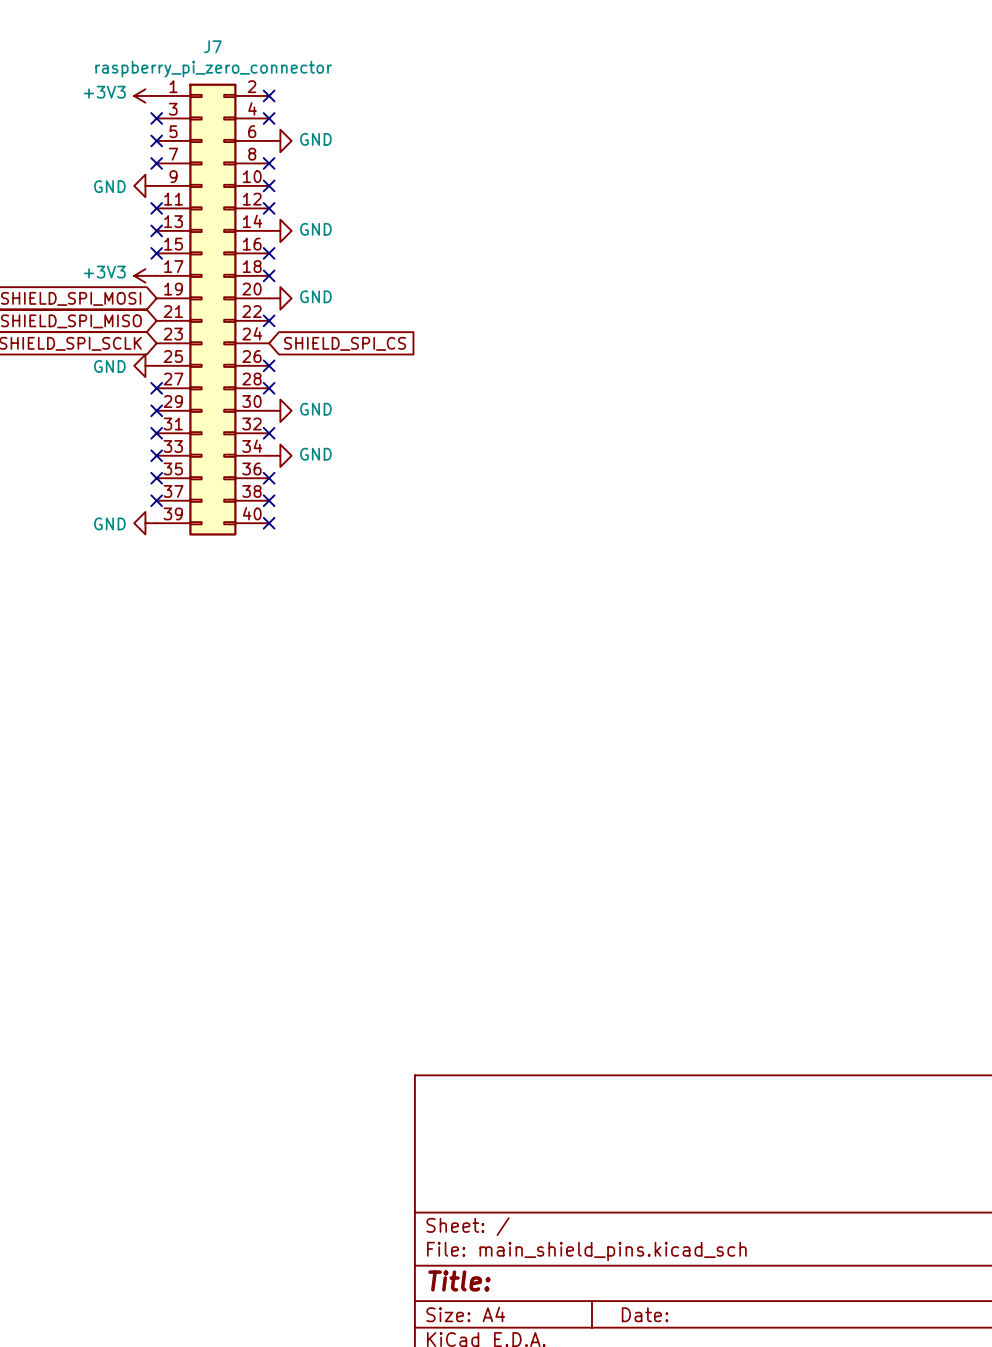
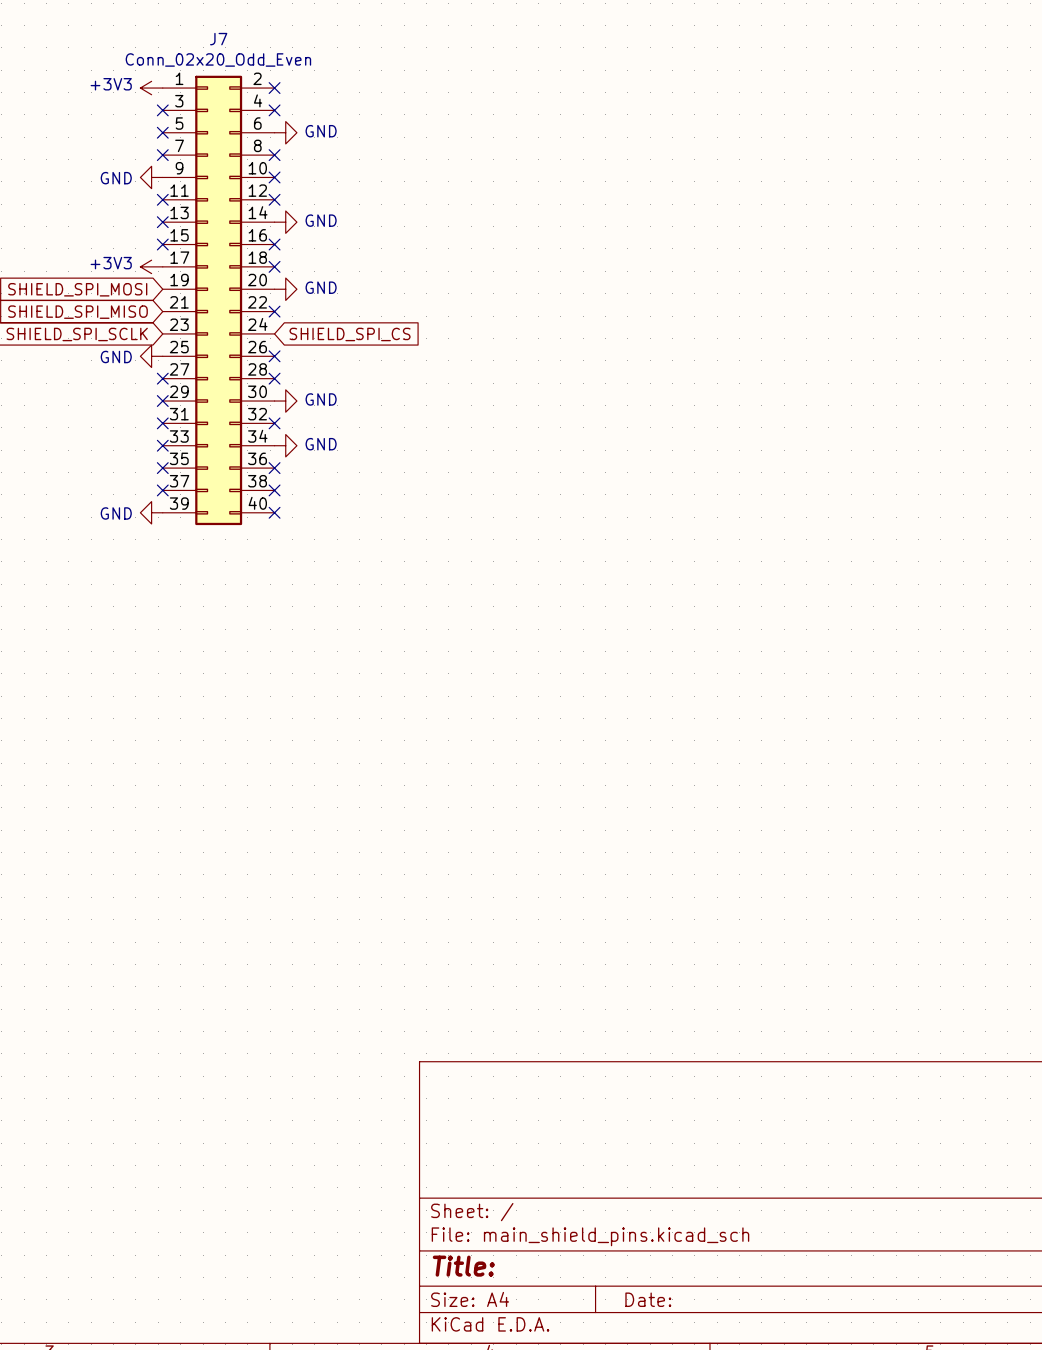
J7 value: raspberry_pi_zero_connector (213, 69) -> Conn_02x20_Odd_Even (218, 59)

